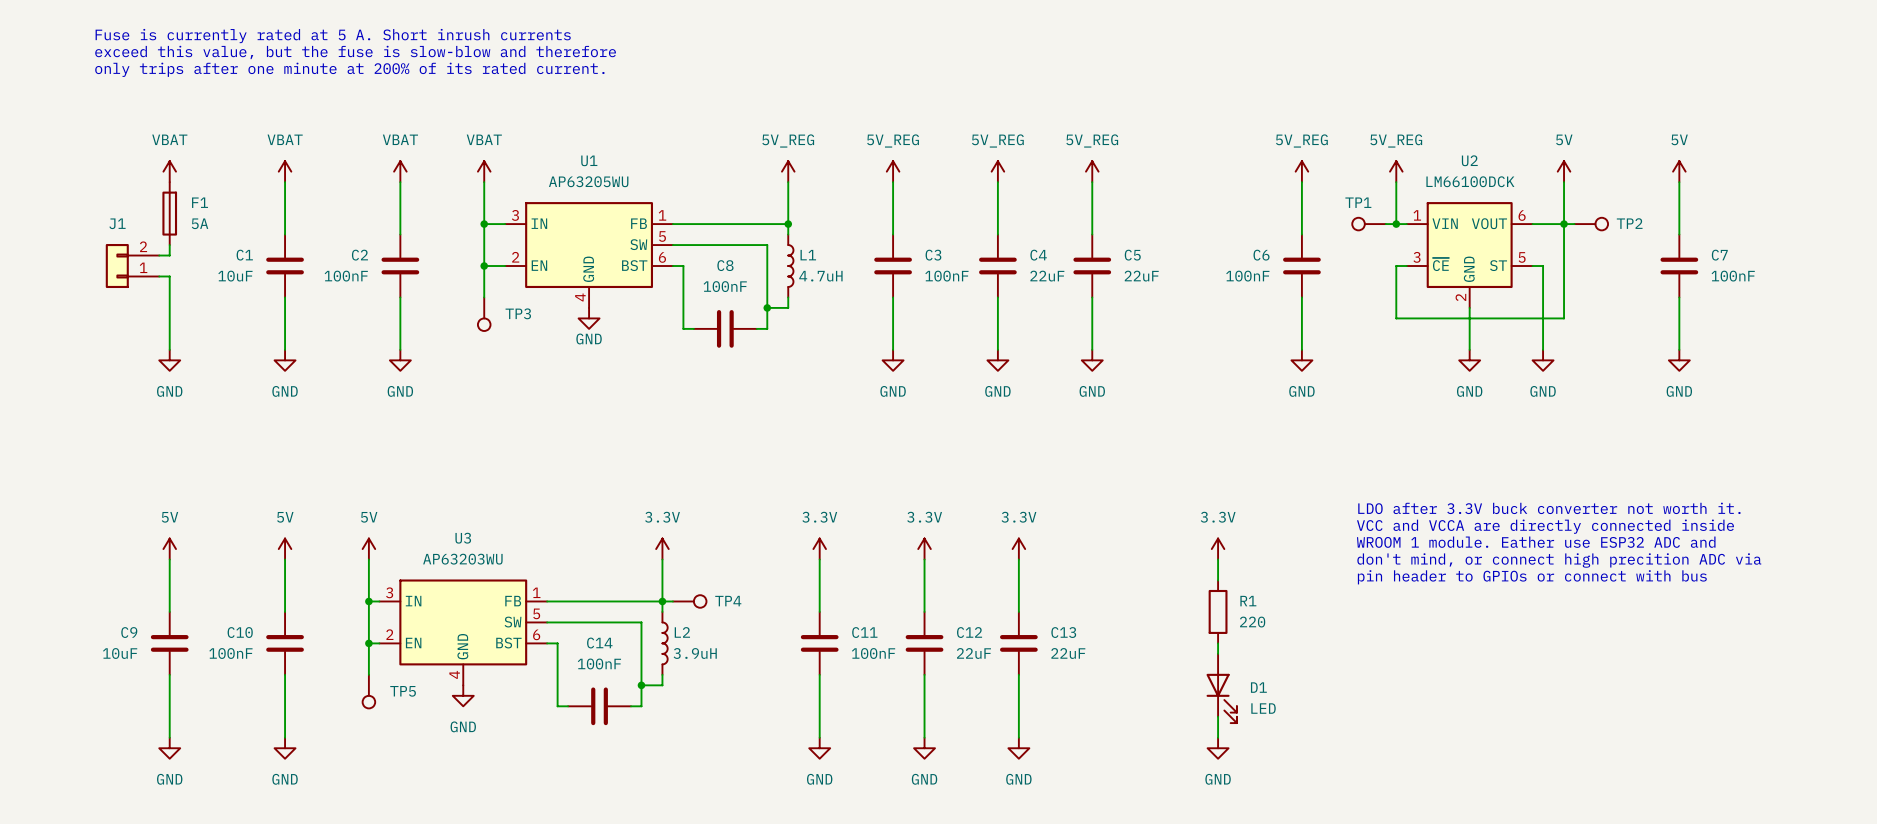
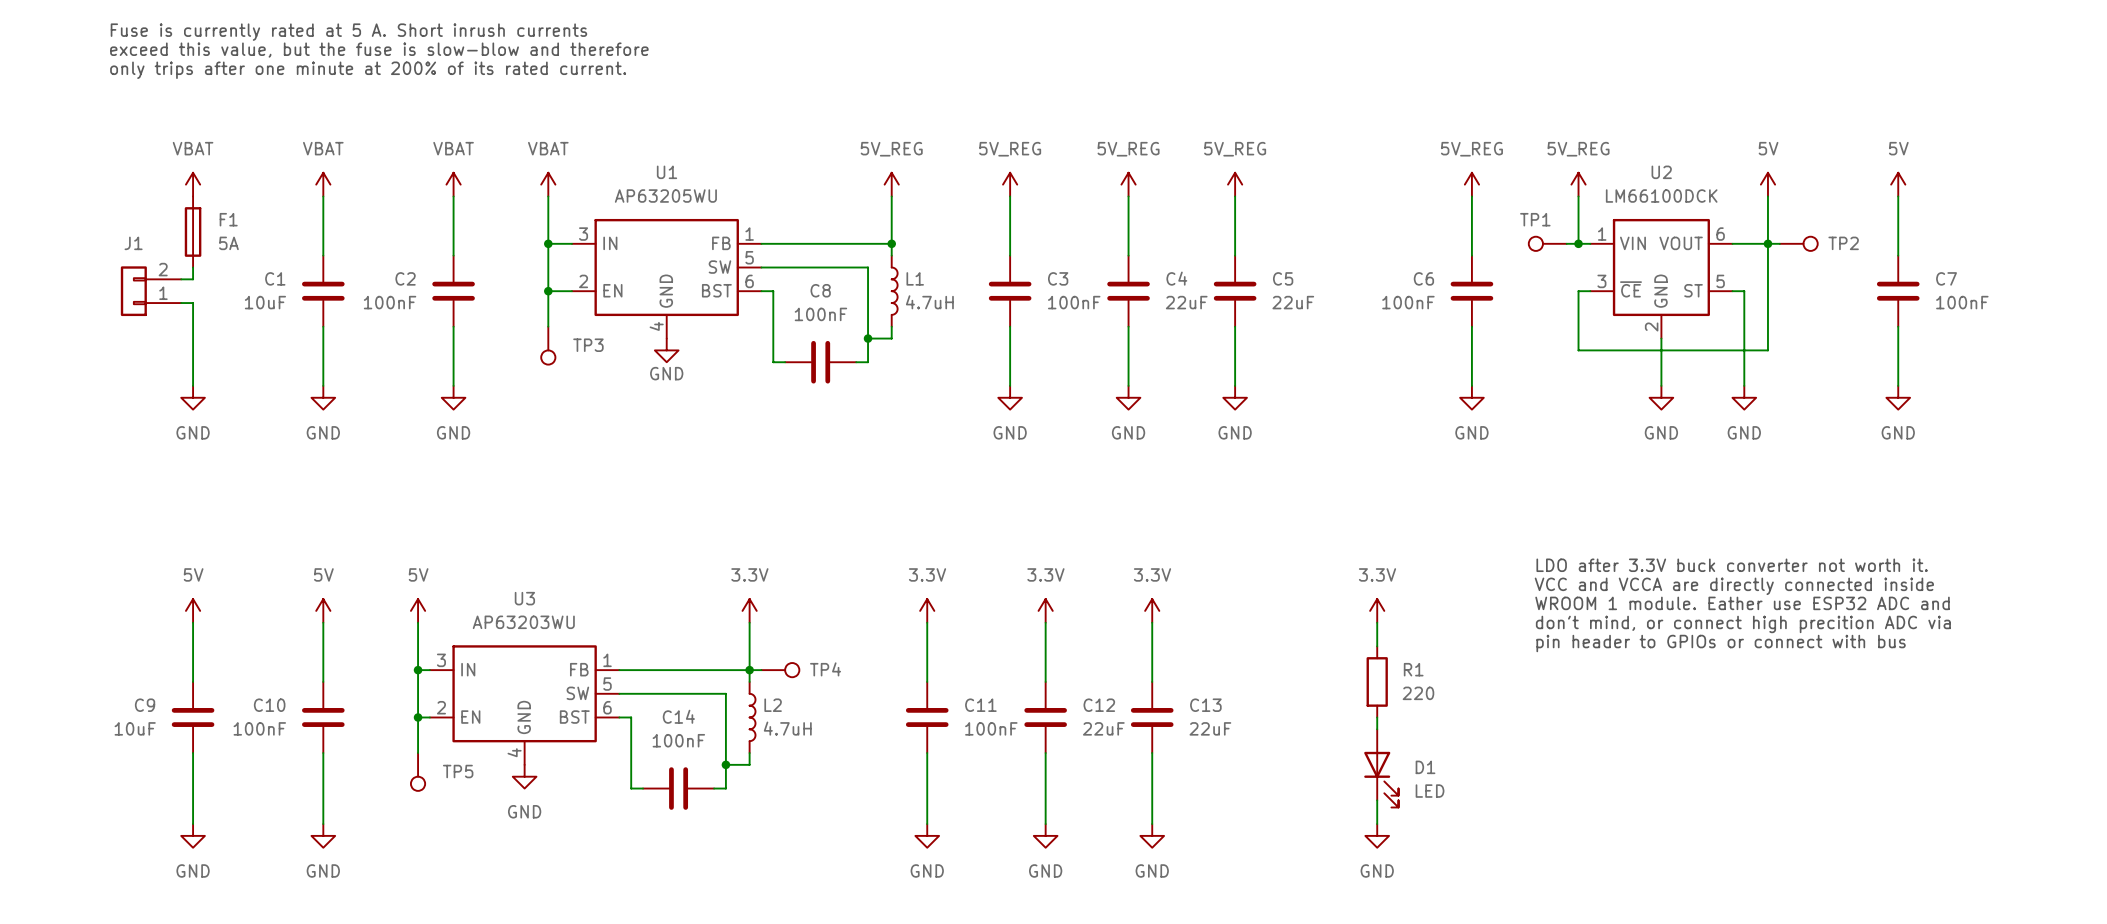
L2 value: 3.9uH (695, 653) -> 4.7uH (787, 728)

